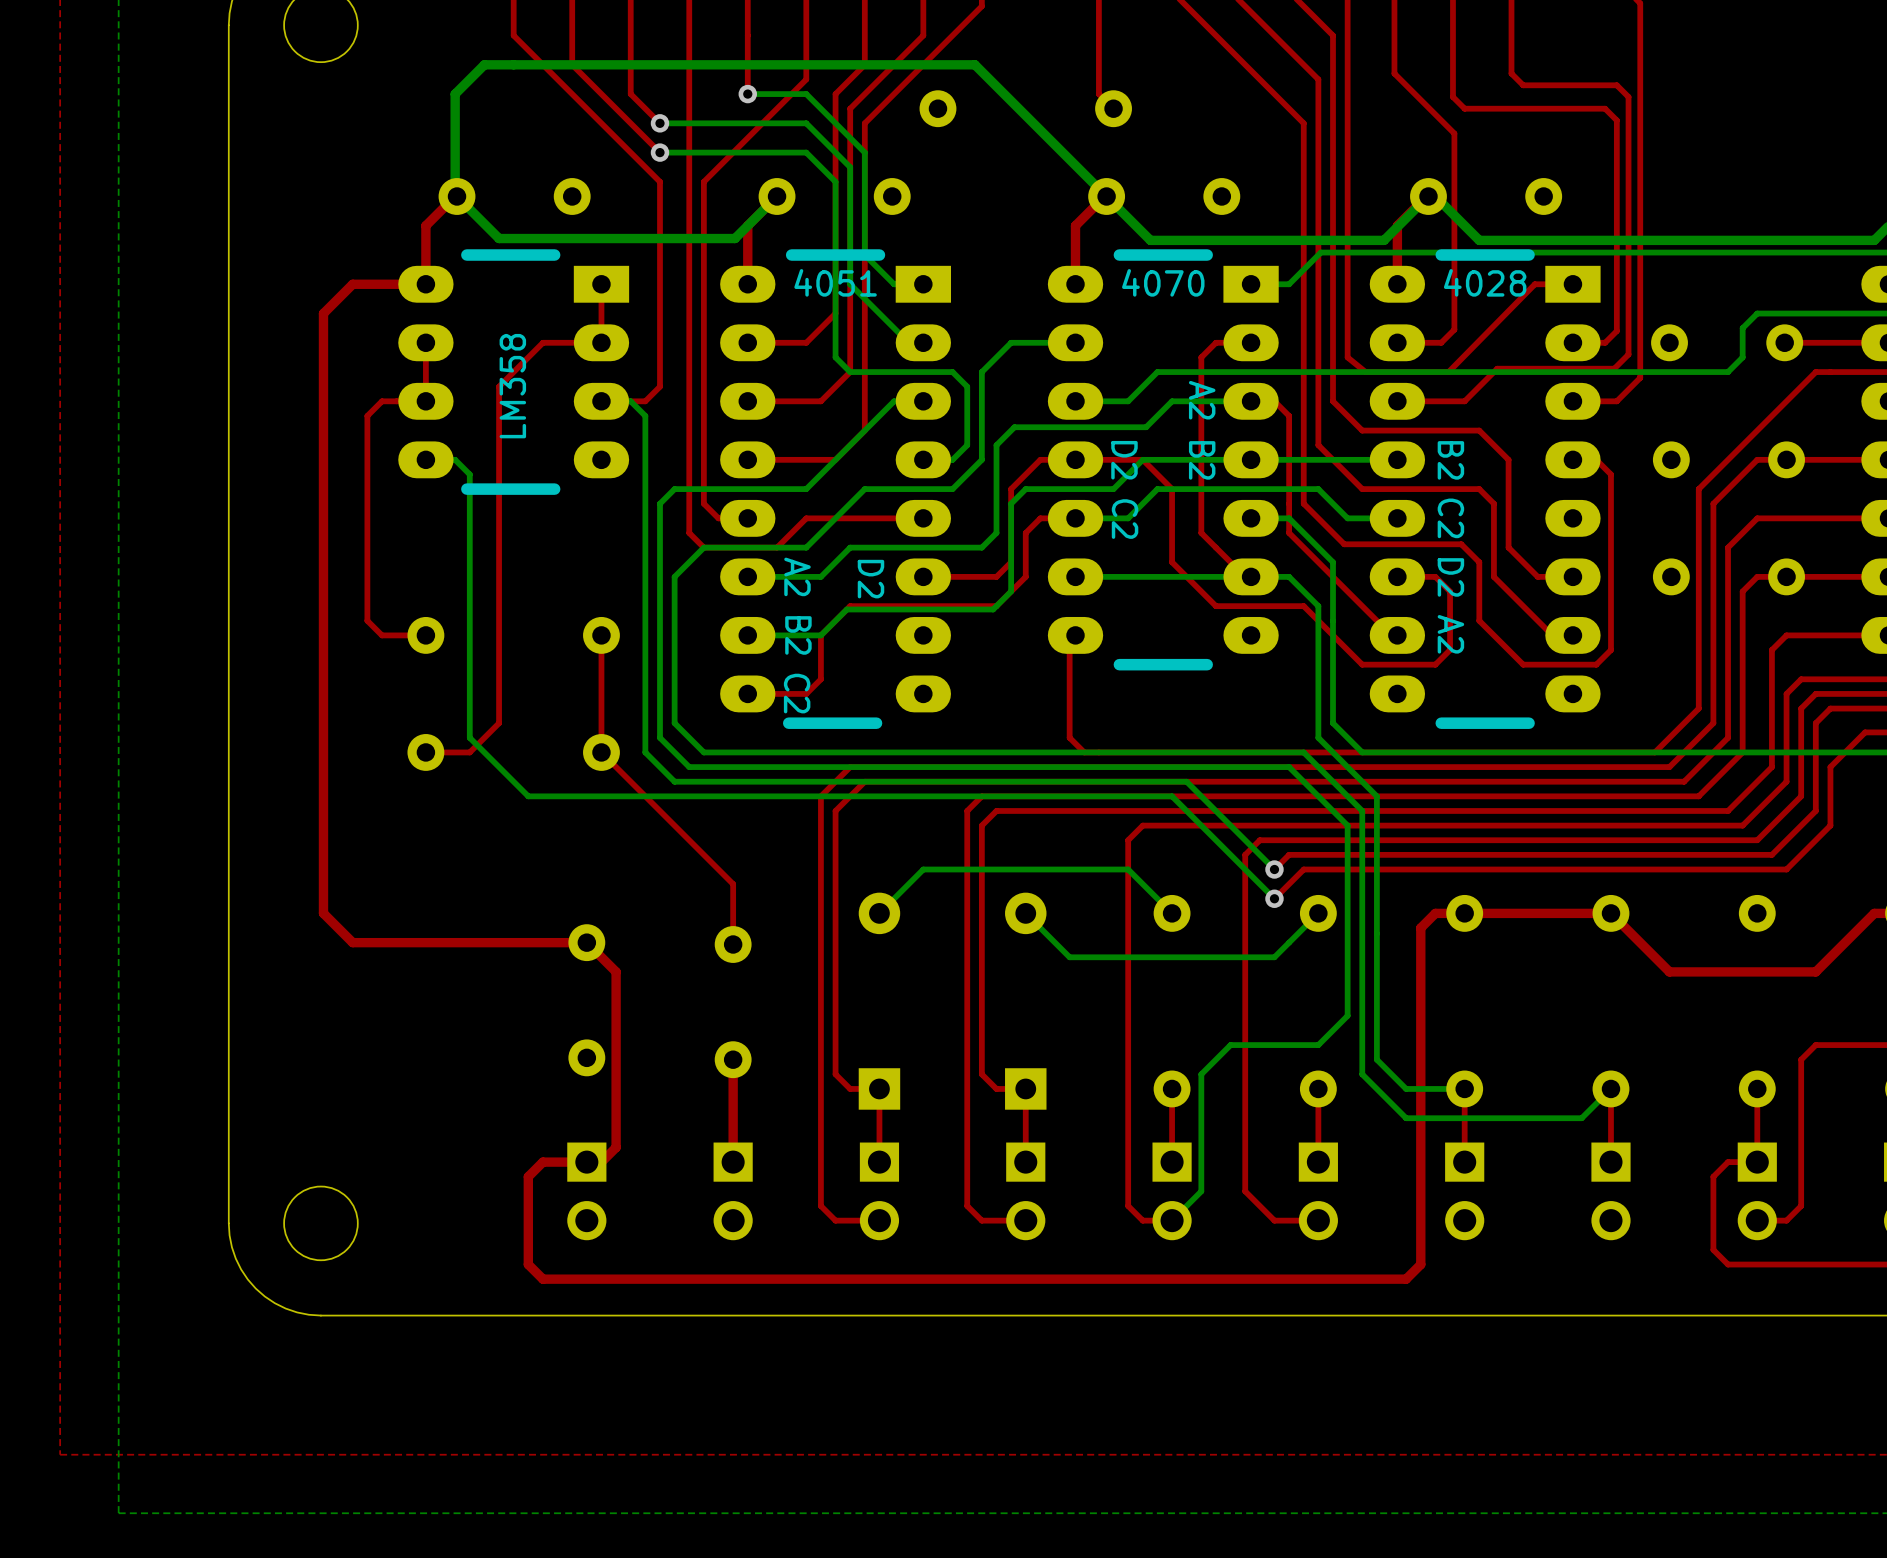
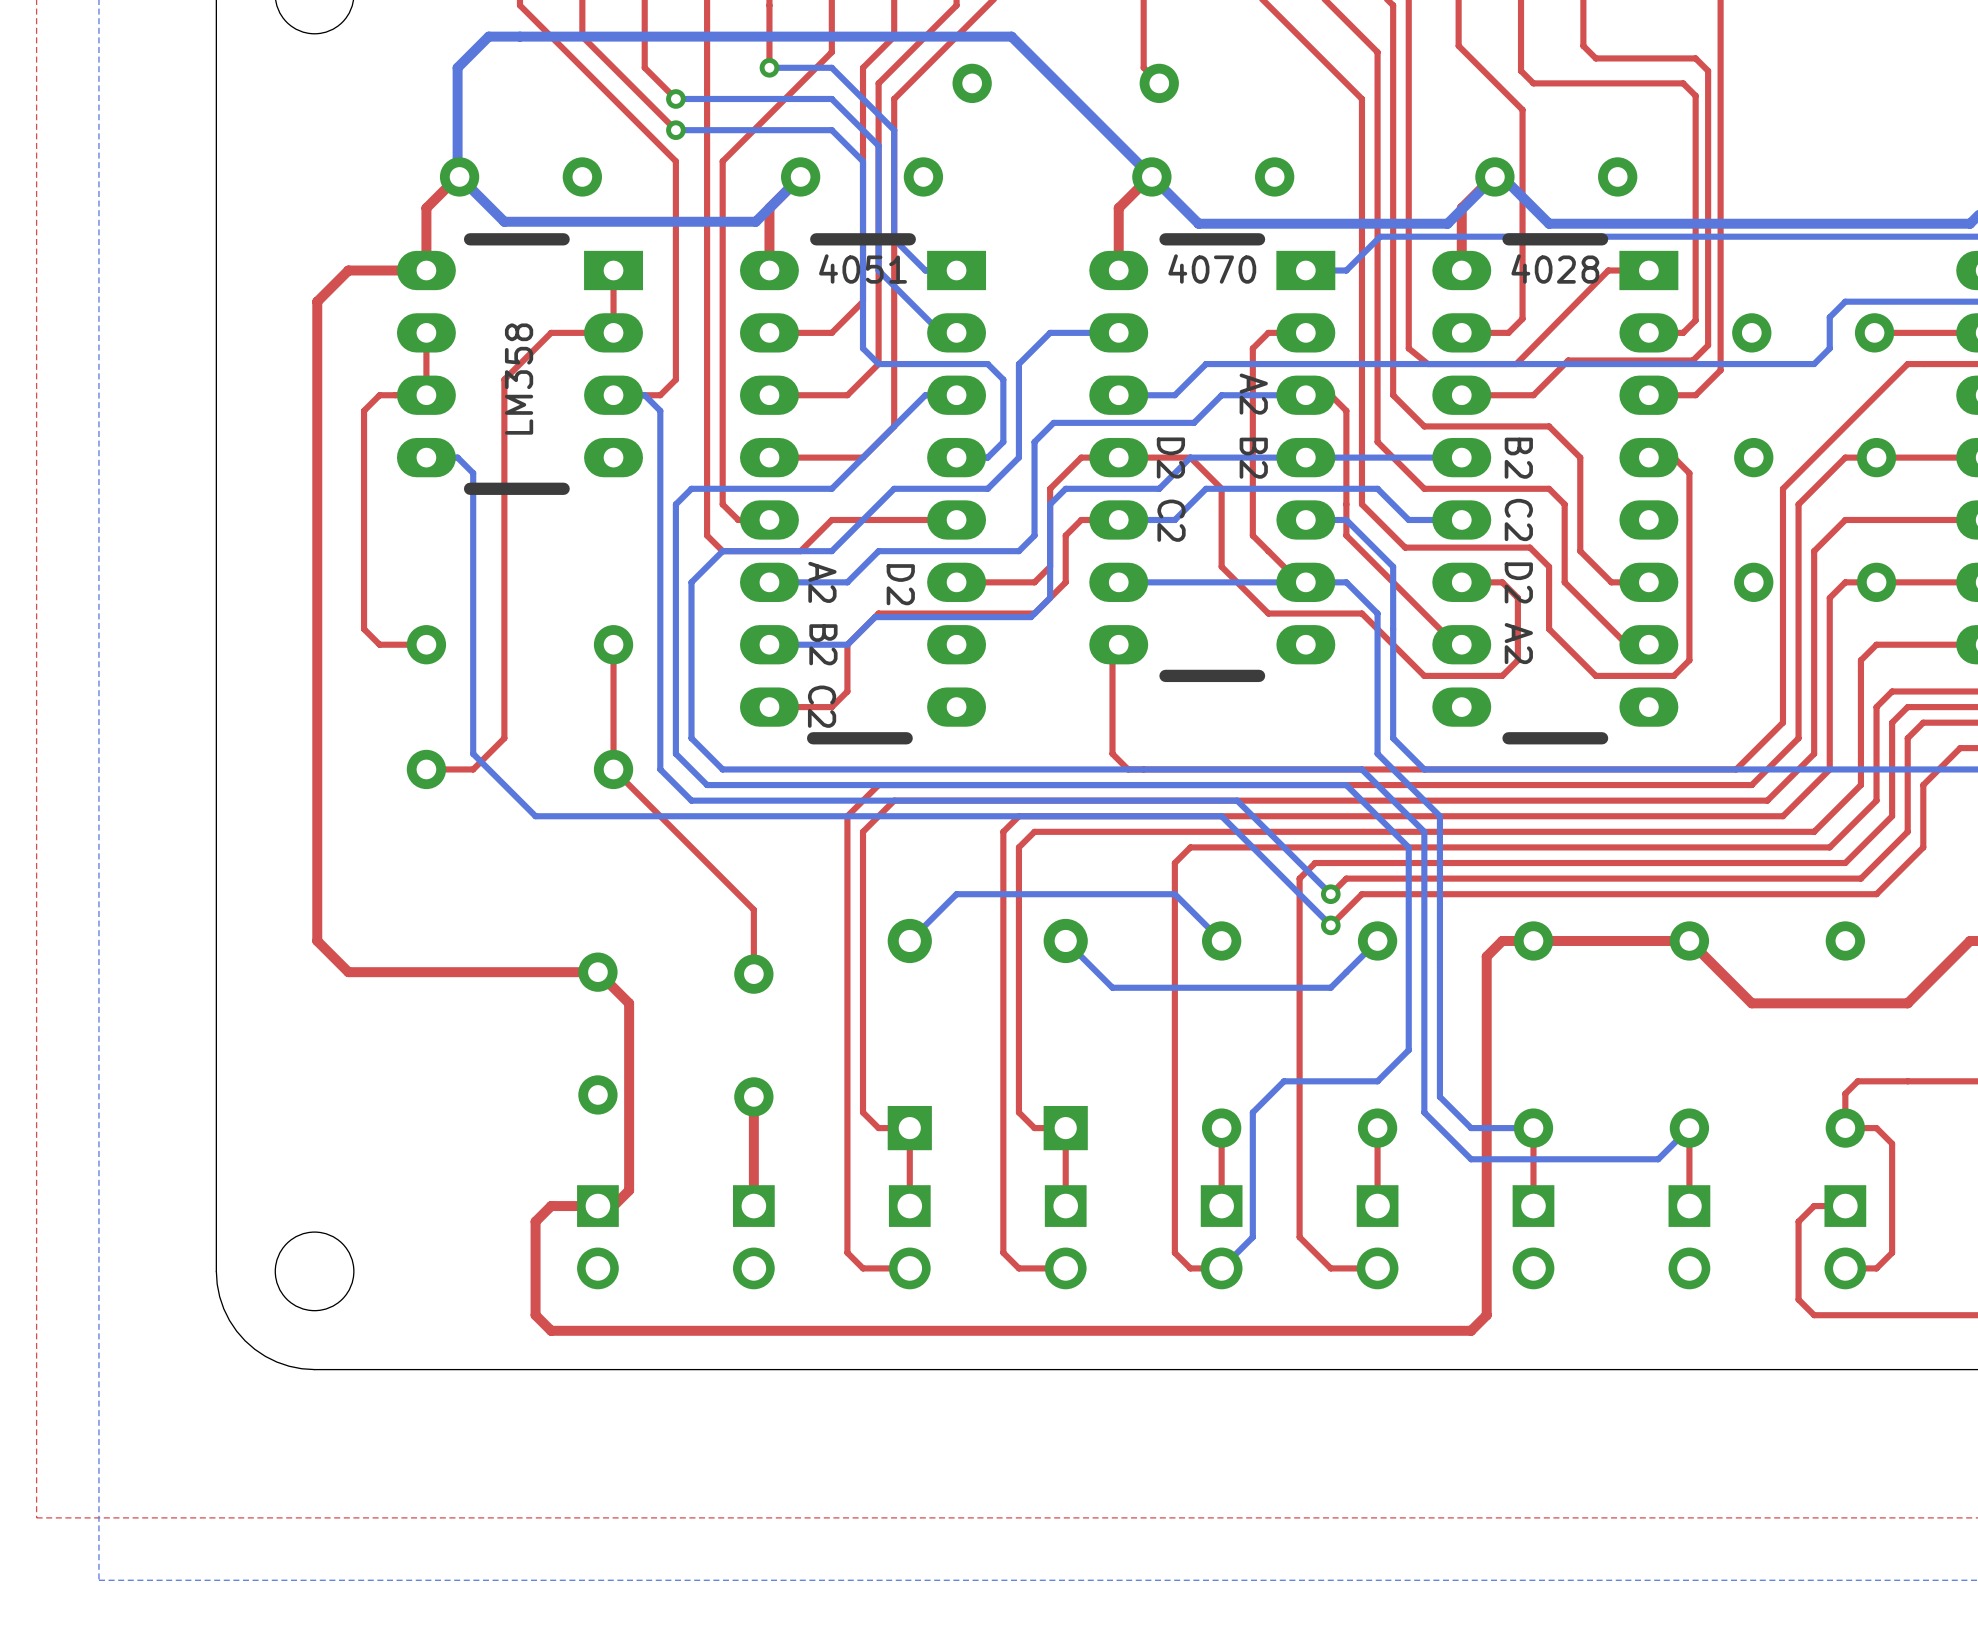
top track: (1815, 1045) (1801, 1059) (1801, 1103) -> (1907, 1081) (1857, 1081) (1845, 1093) (1845, 1128) (1876, 1128) (1892, 1143)
top track: (1757, 1088) (1757, 1162) -> none

